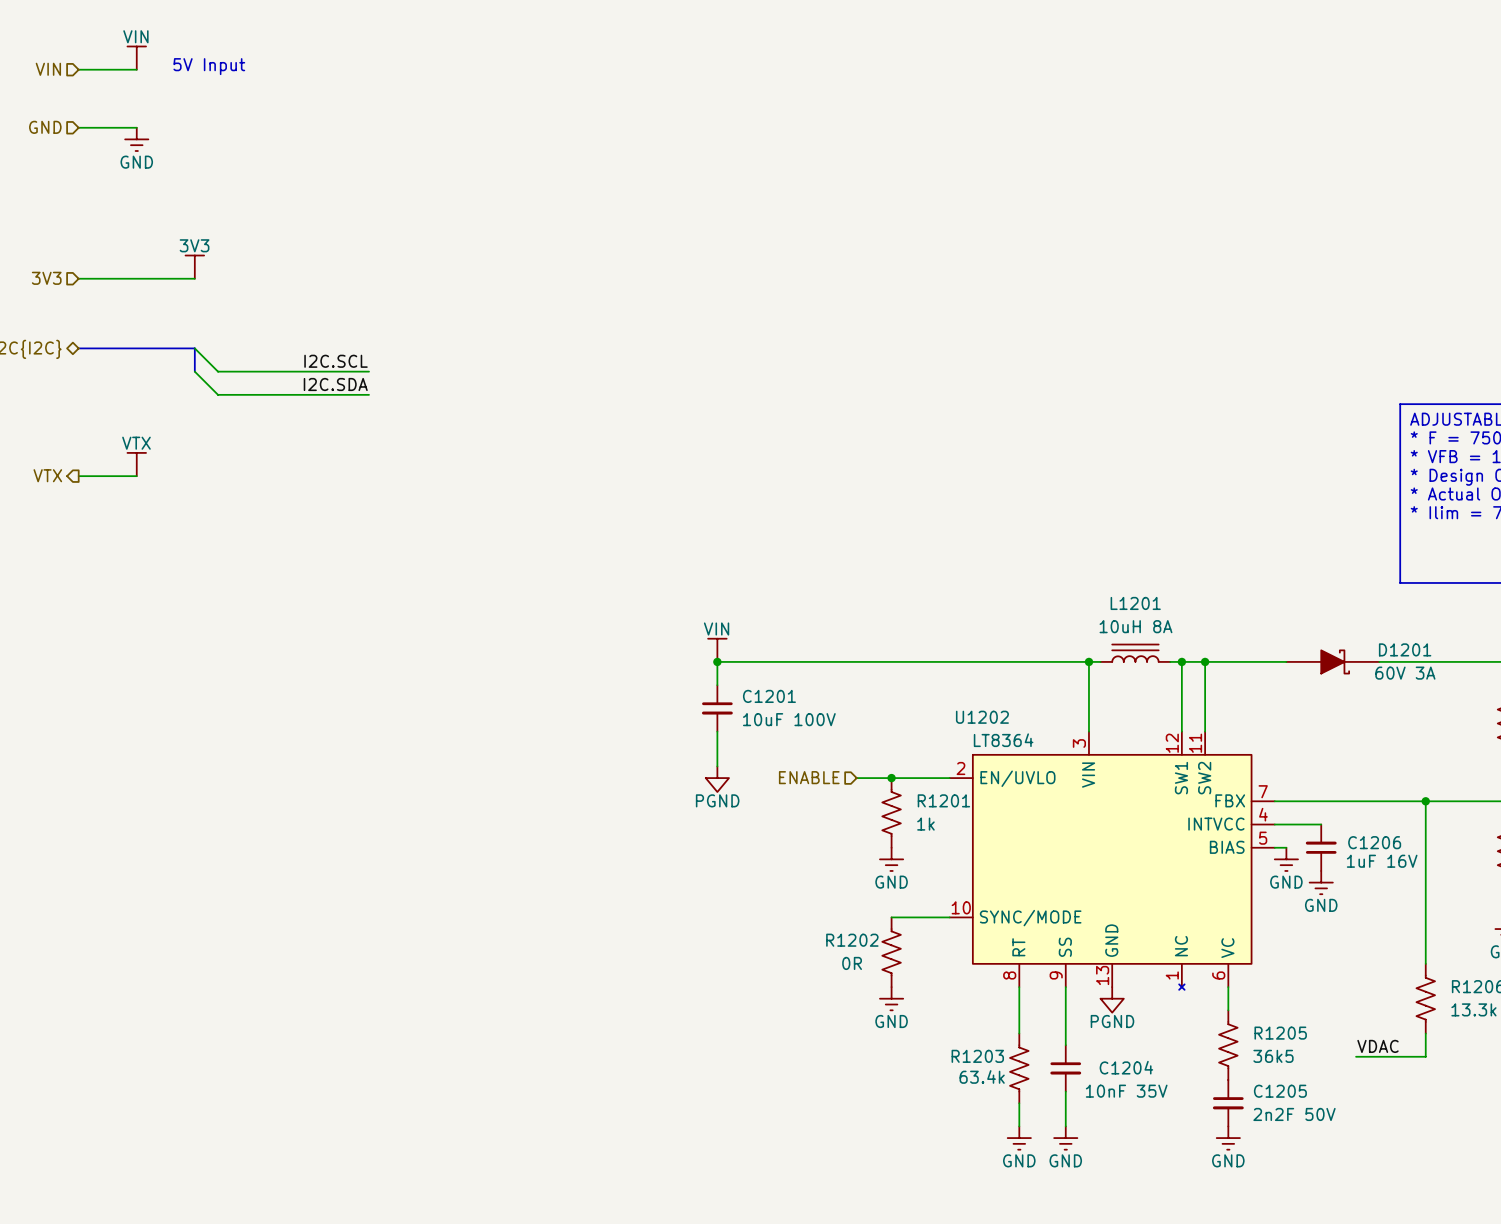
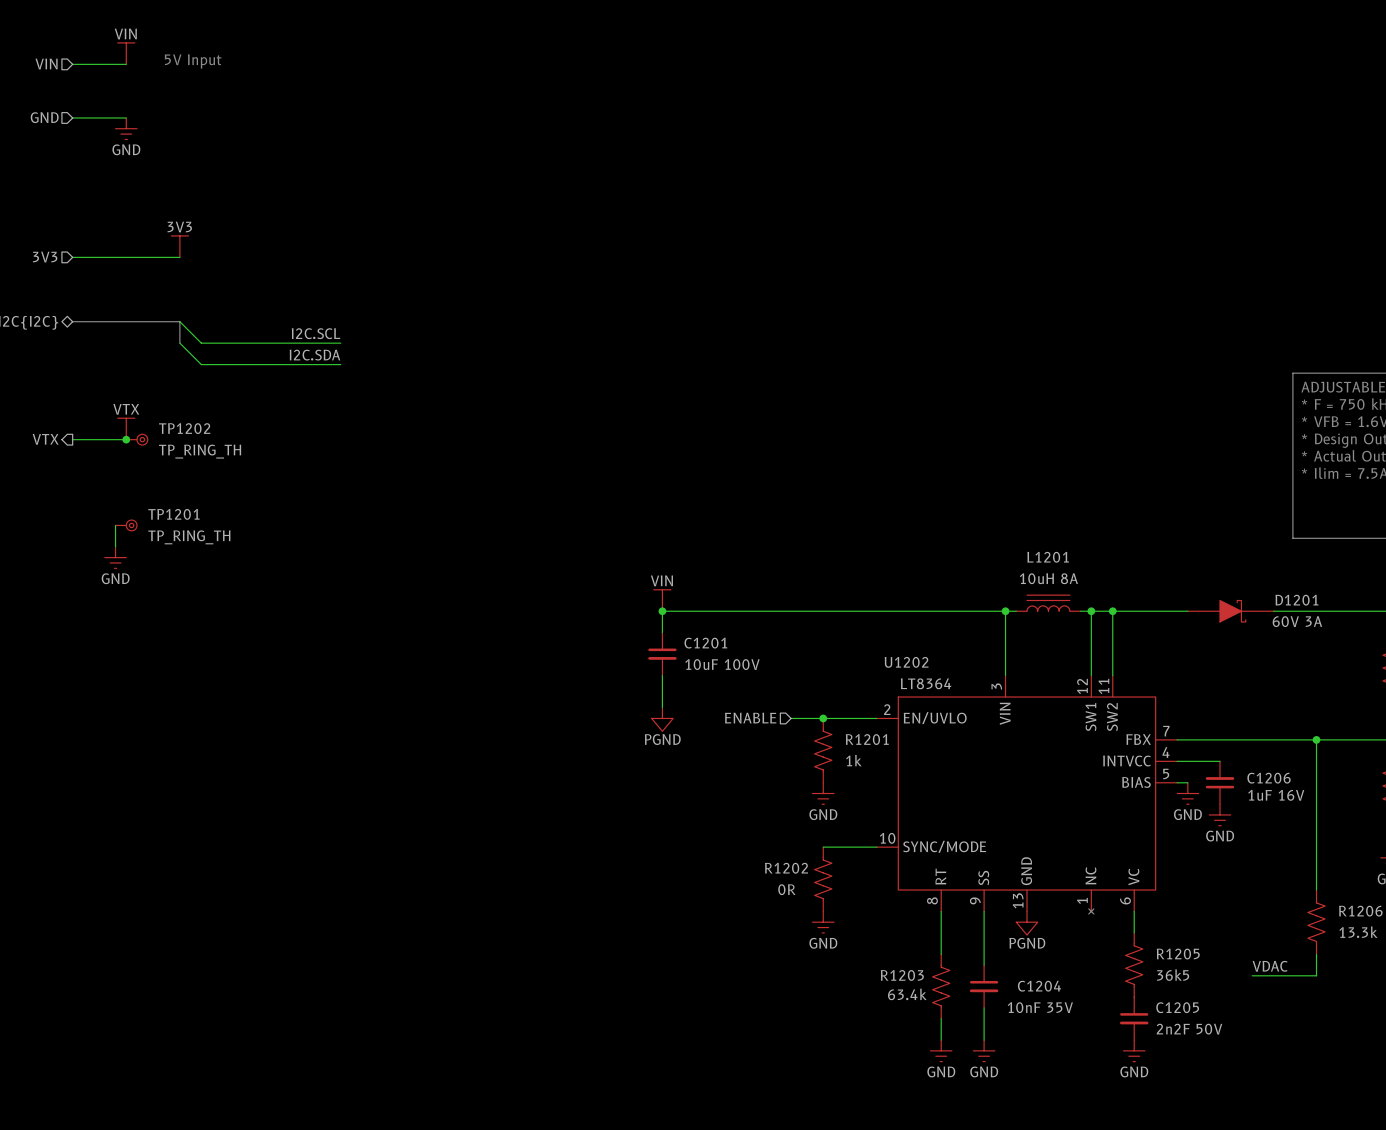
junction: none -> (126, 439)
TP1202: none -> TP_RING_TH (137, 439)
wire: none -> (115, 525) (115, 546)
TP1201: none -> TP_RING_TH (126, 525)
power symbol: none -> GND (115, 557)

